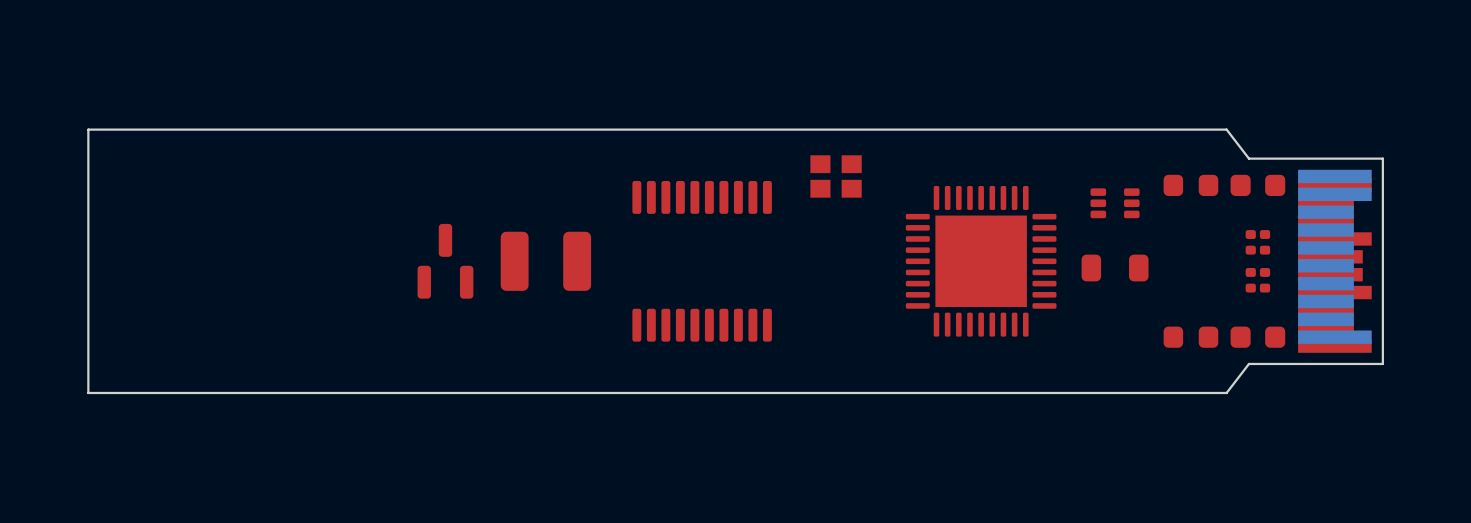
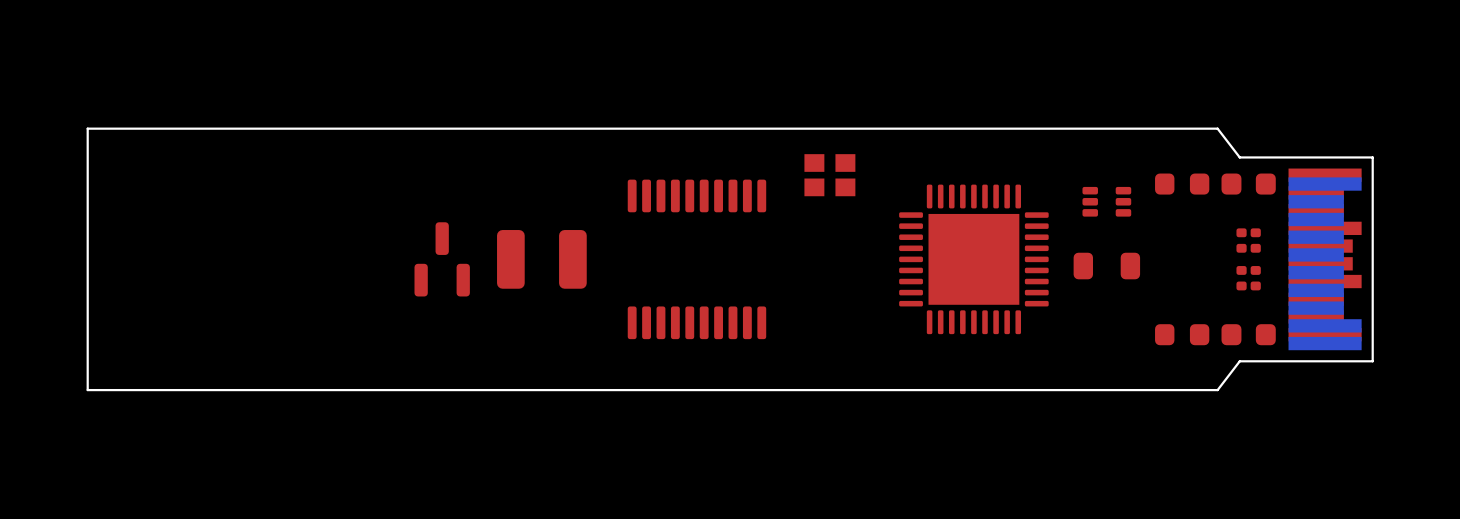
part footprint: [1298, 169, 1372, 353] -> [1288, 168, 1362, 351]

